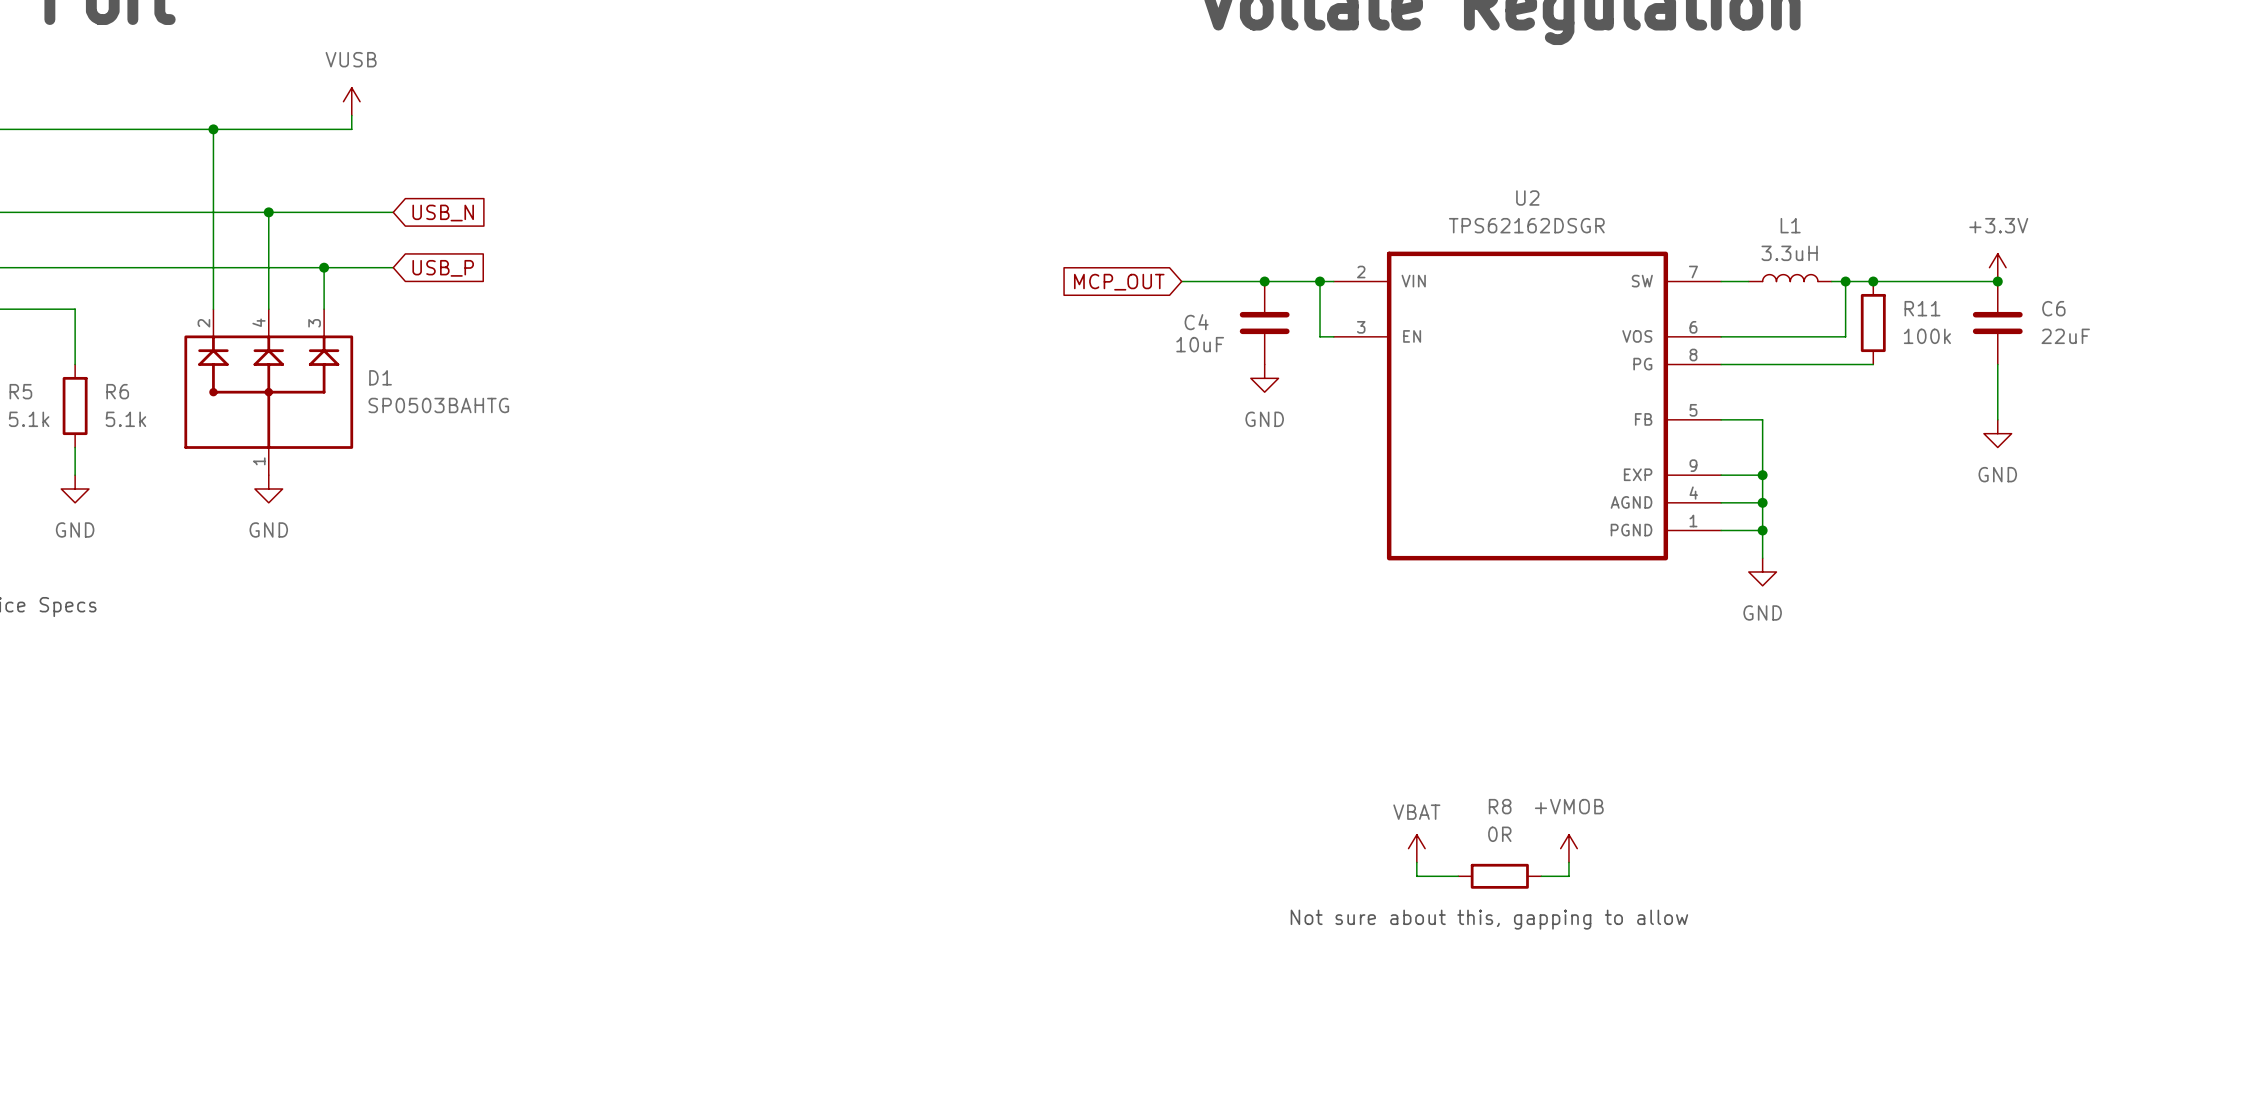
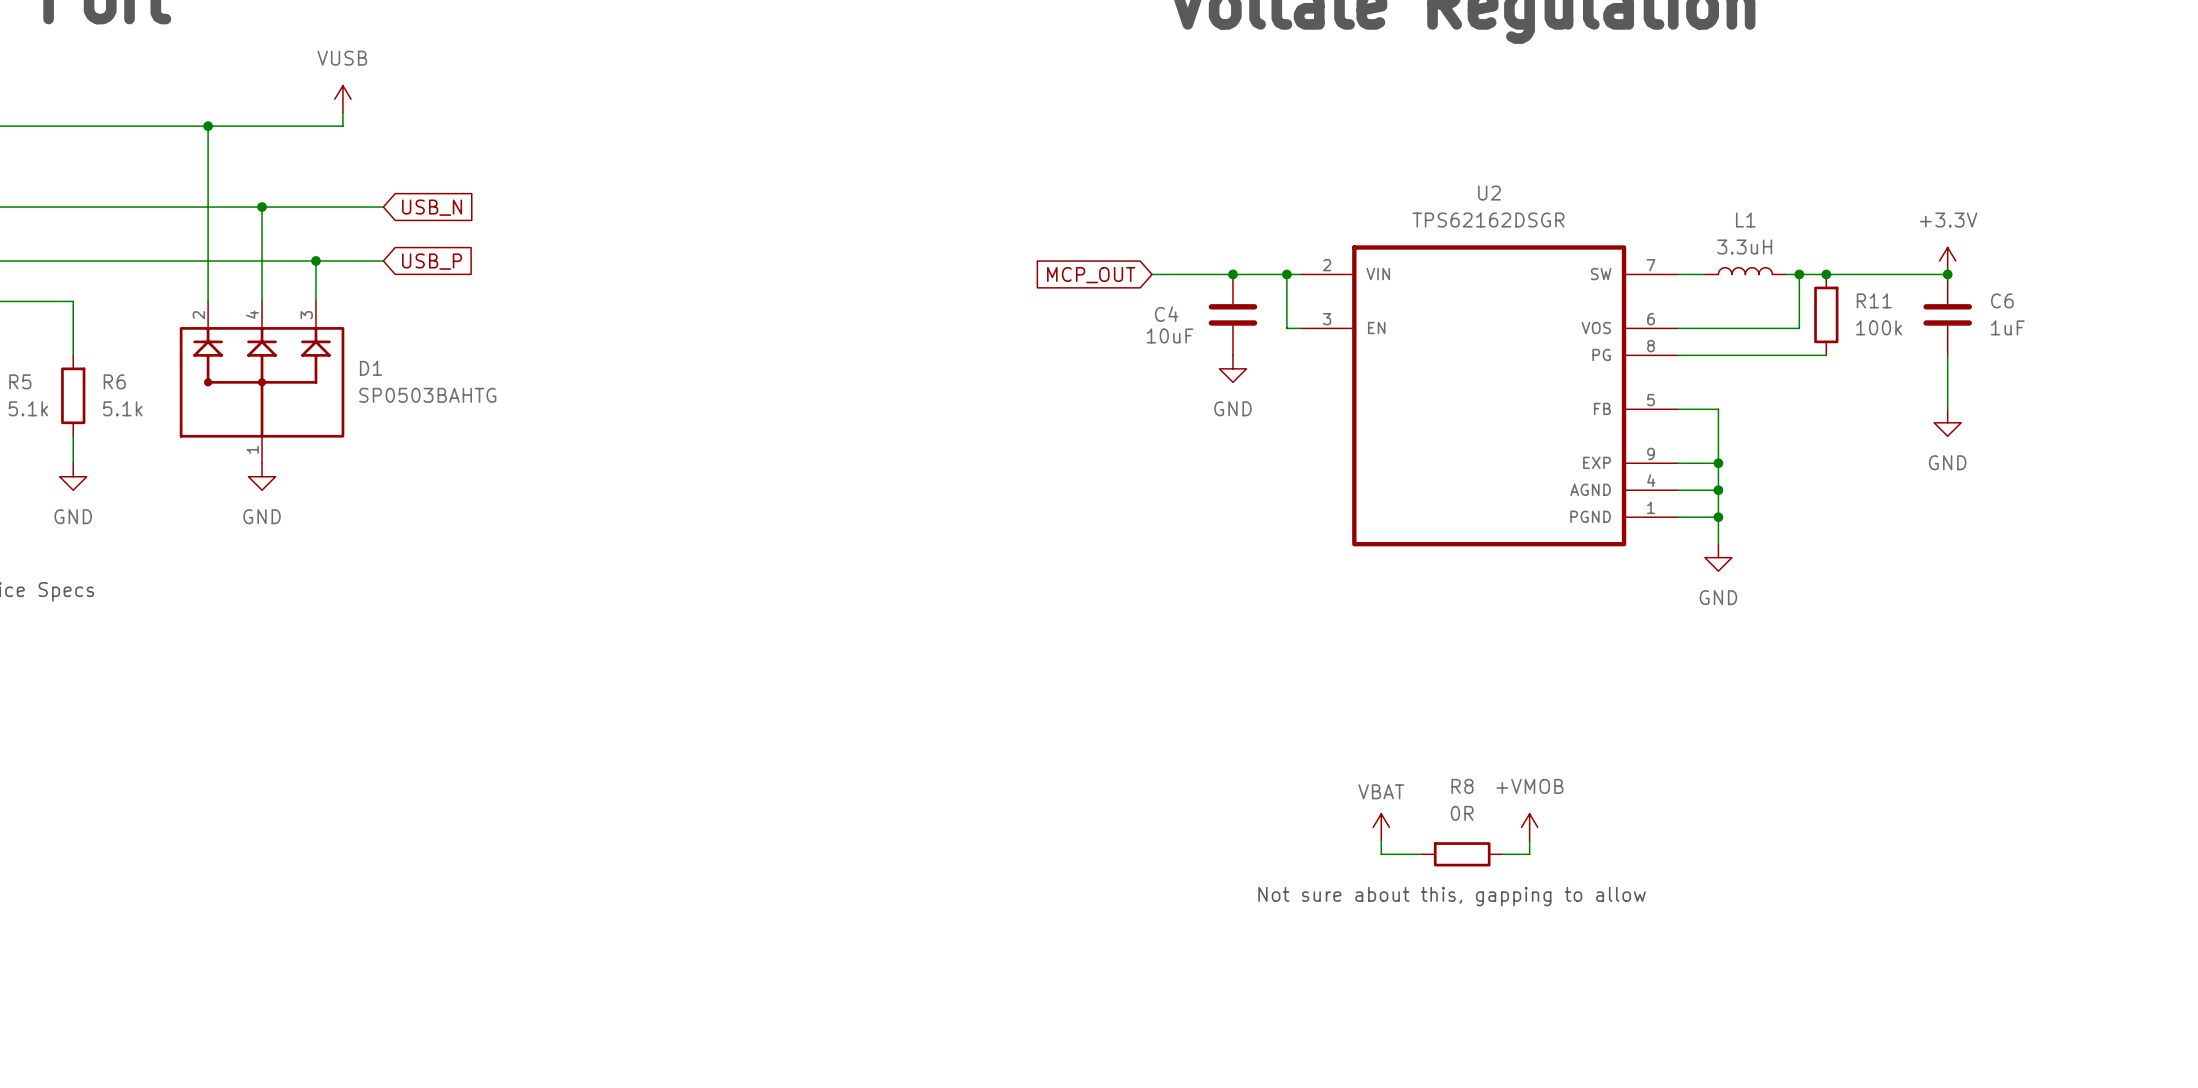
C6 value: 22uF (2065, 336) -> 1uF (2007, 327)

